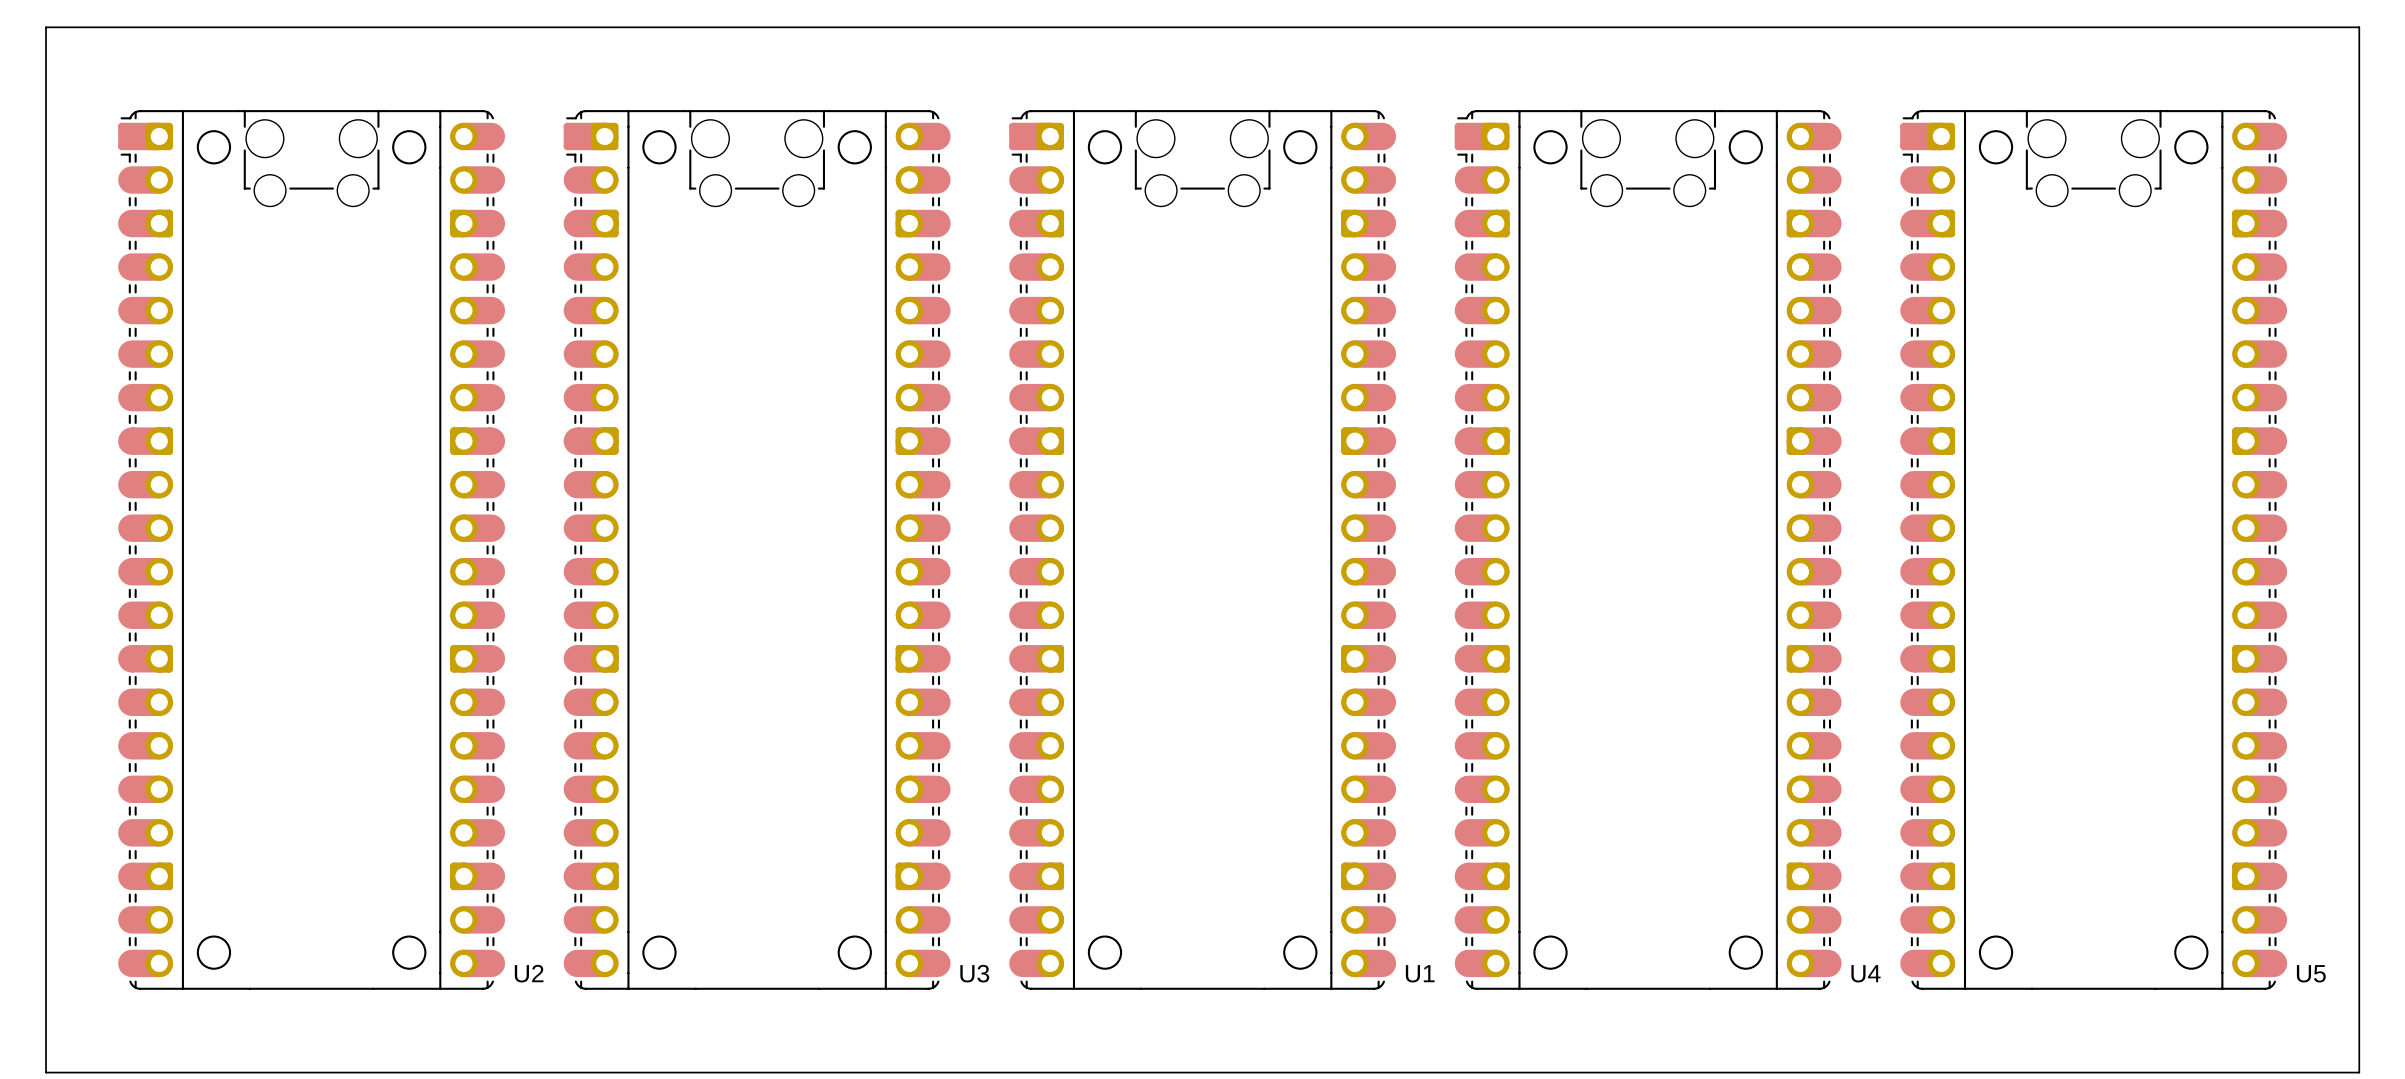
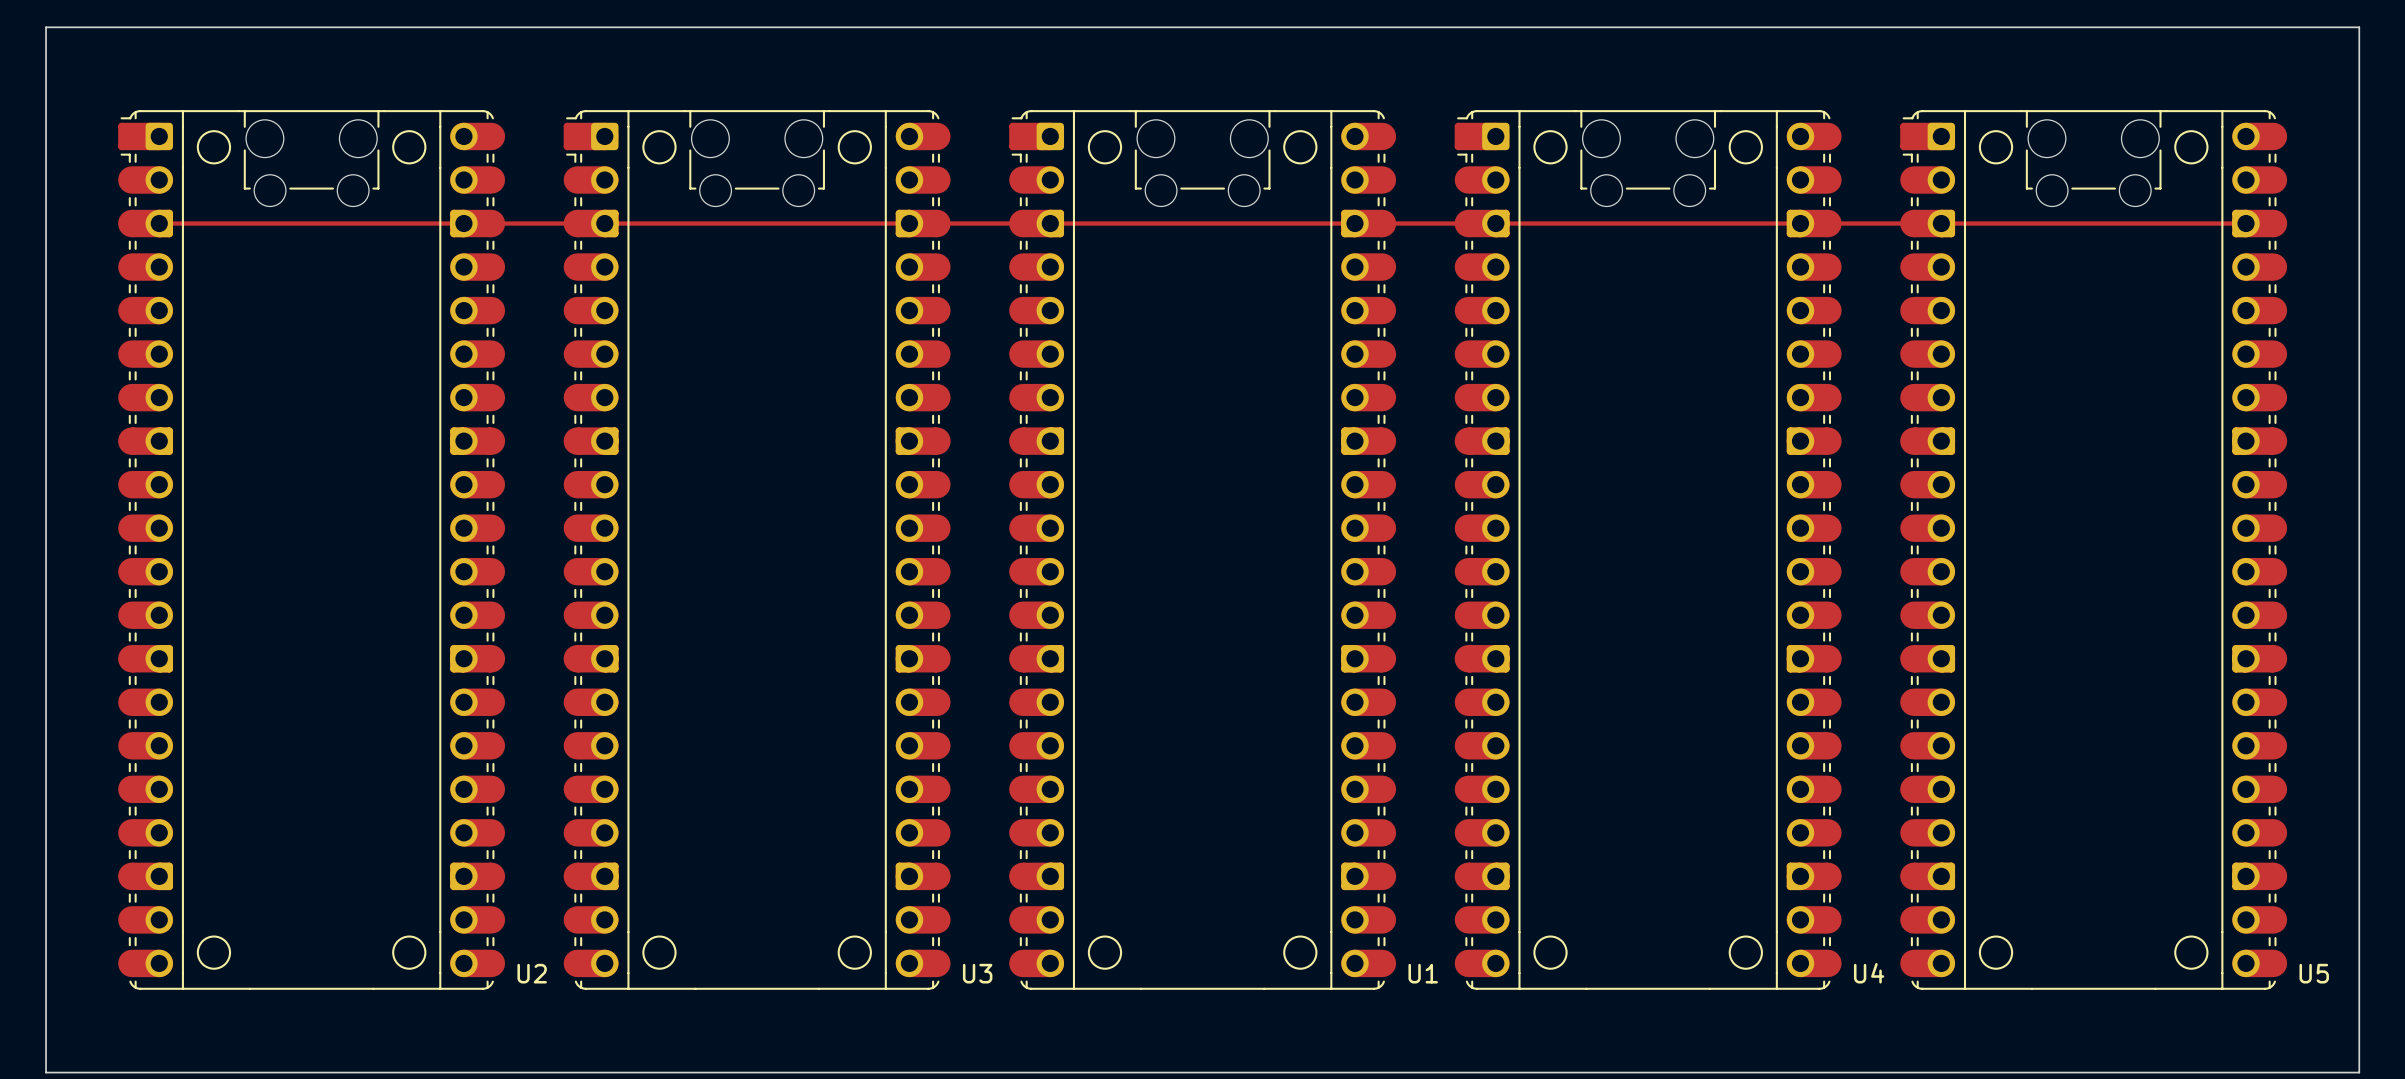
top track: none -> (159, 223) (2246, 223)

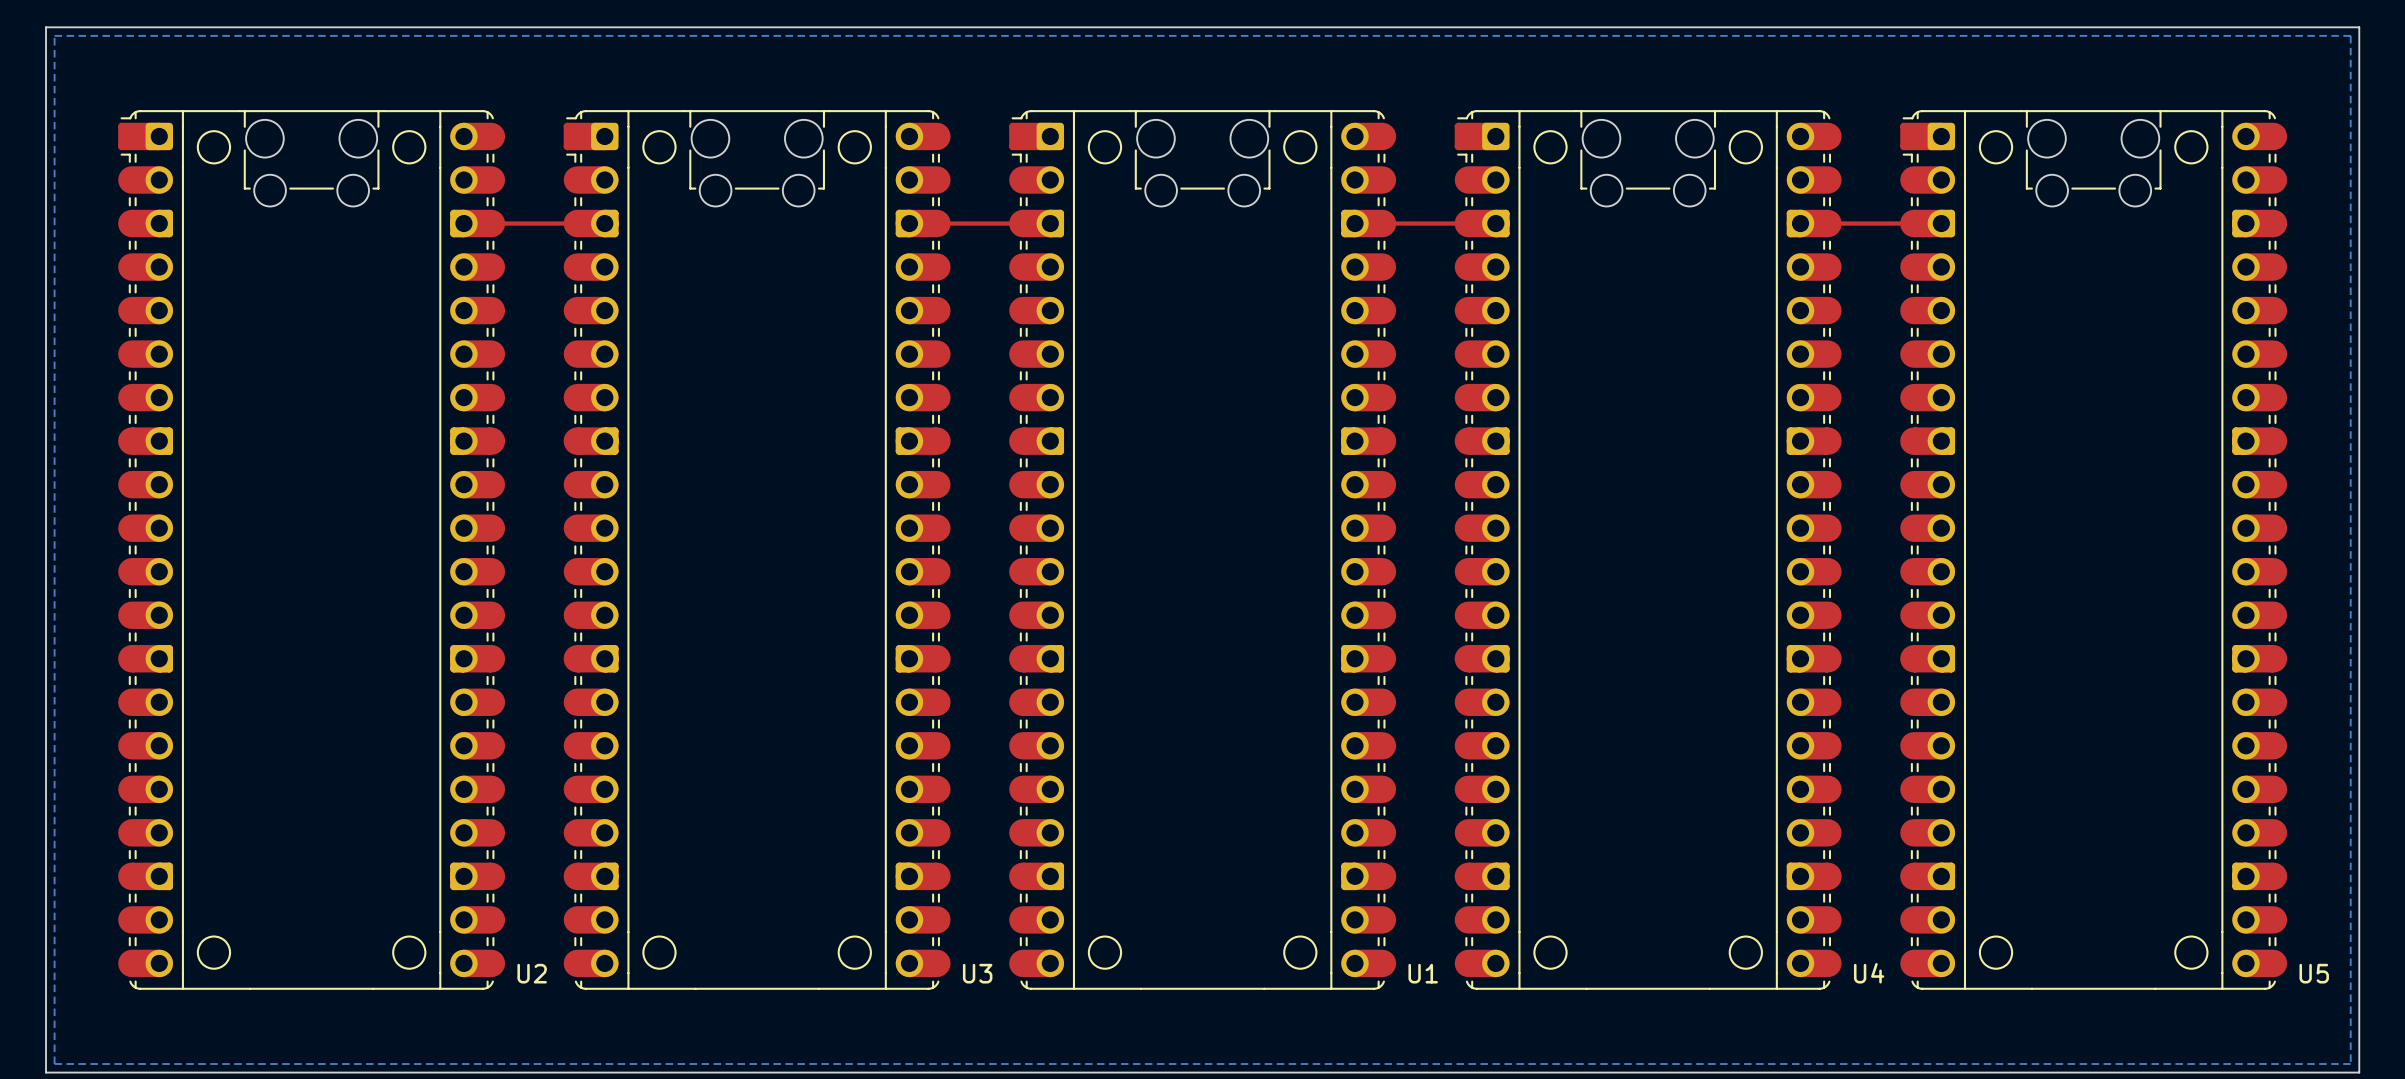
bottom zone outline: none -> (54, 35) (2350, 35) (2350, 1064) (54, 1064) (54, 35)
top track: (159, 223) (463, 223) -> none
top track: (604, 223) (909, 223) -> none
top track: (1050, 223) (1354, 223) -> none
top track: (1495, 223) (1800, 223) -> none
top track: (1941, 223) (2246, 223) -> none

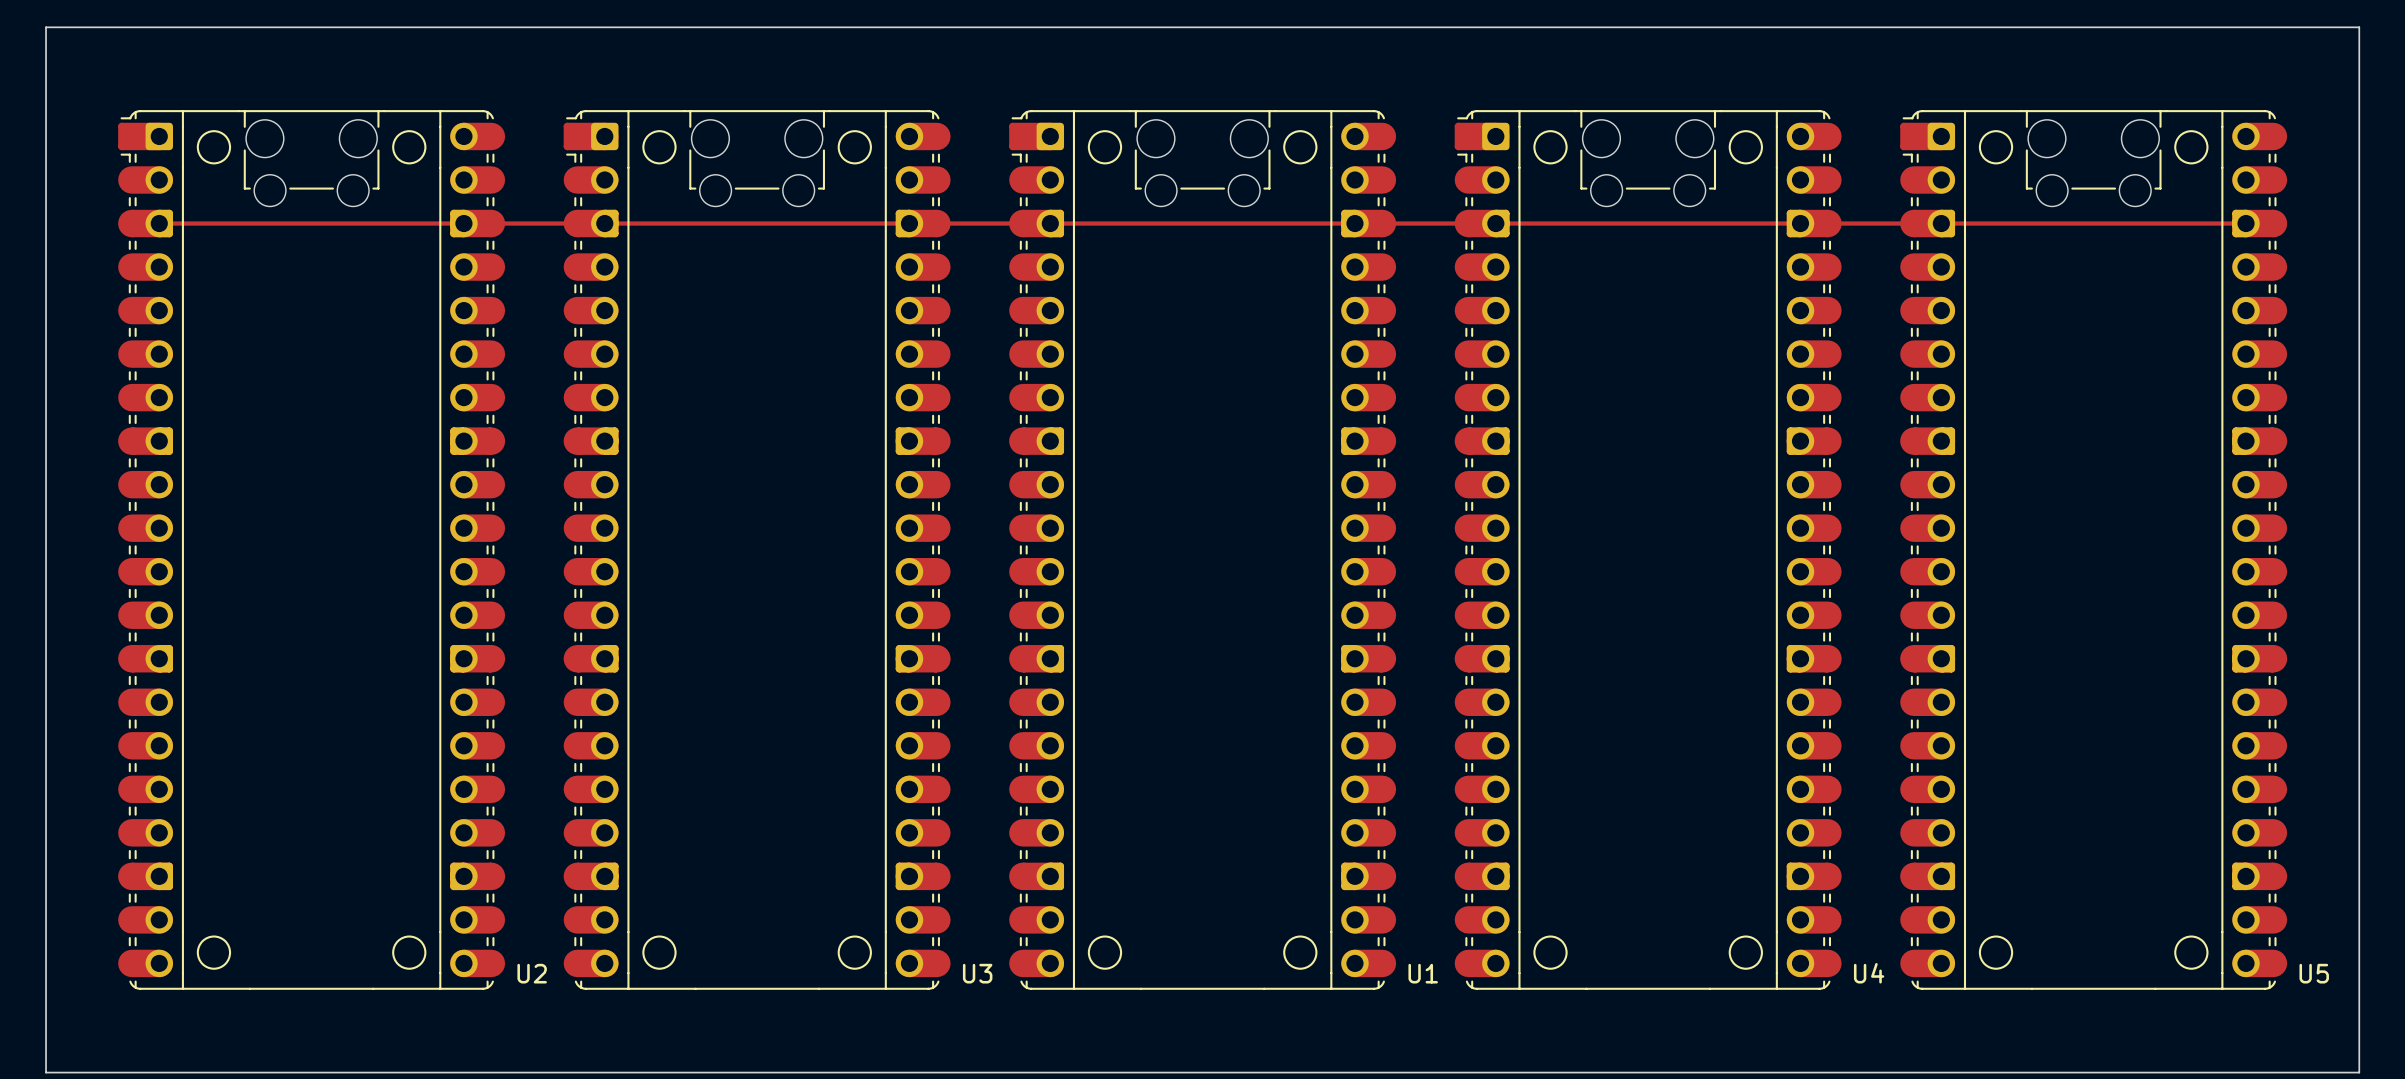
bottom zone outline: (54, 35) (2350, 35) (2350, 1064) (54, 1064) (54, 35) -> none
top track: none -> (159, 223) (463, 223)
top track: none -> (604, 223) (909, 223)
top track: none -> (1050, 223) (1354, 223)
top track: none -> (1495, 223) (1800, 223)
top track: none -> (1941, 223) (2246, 223)

